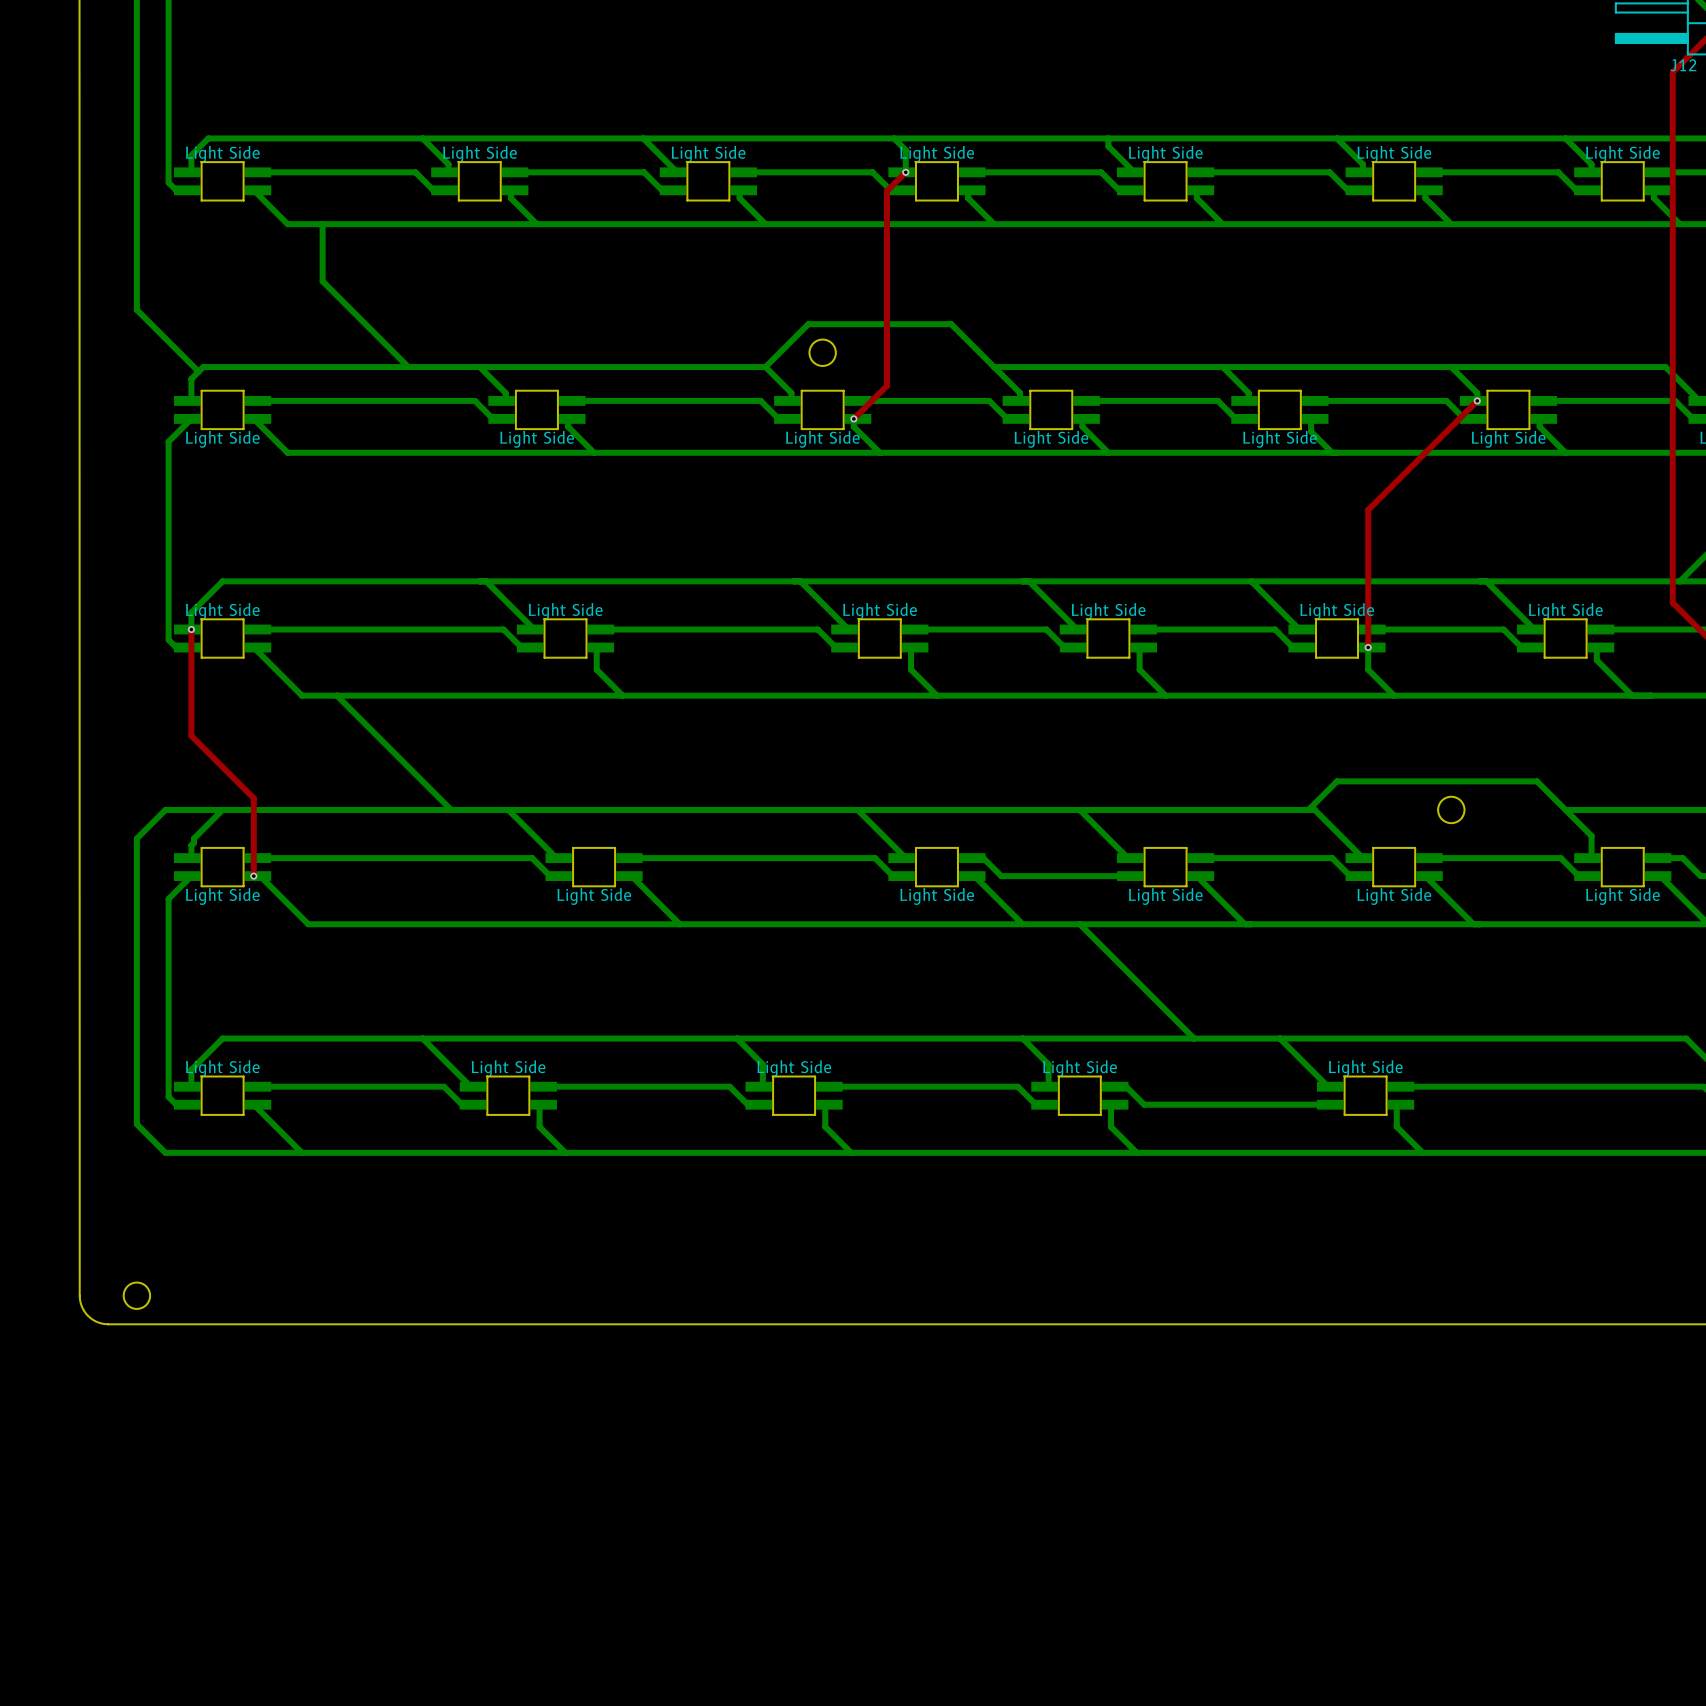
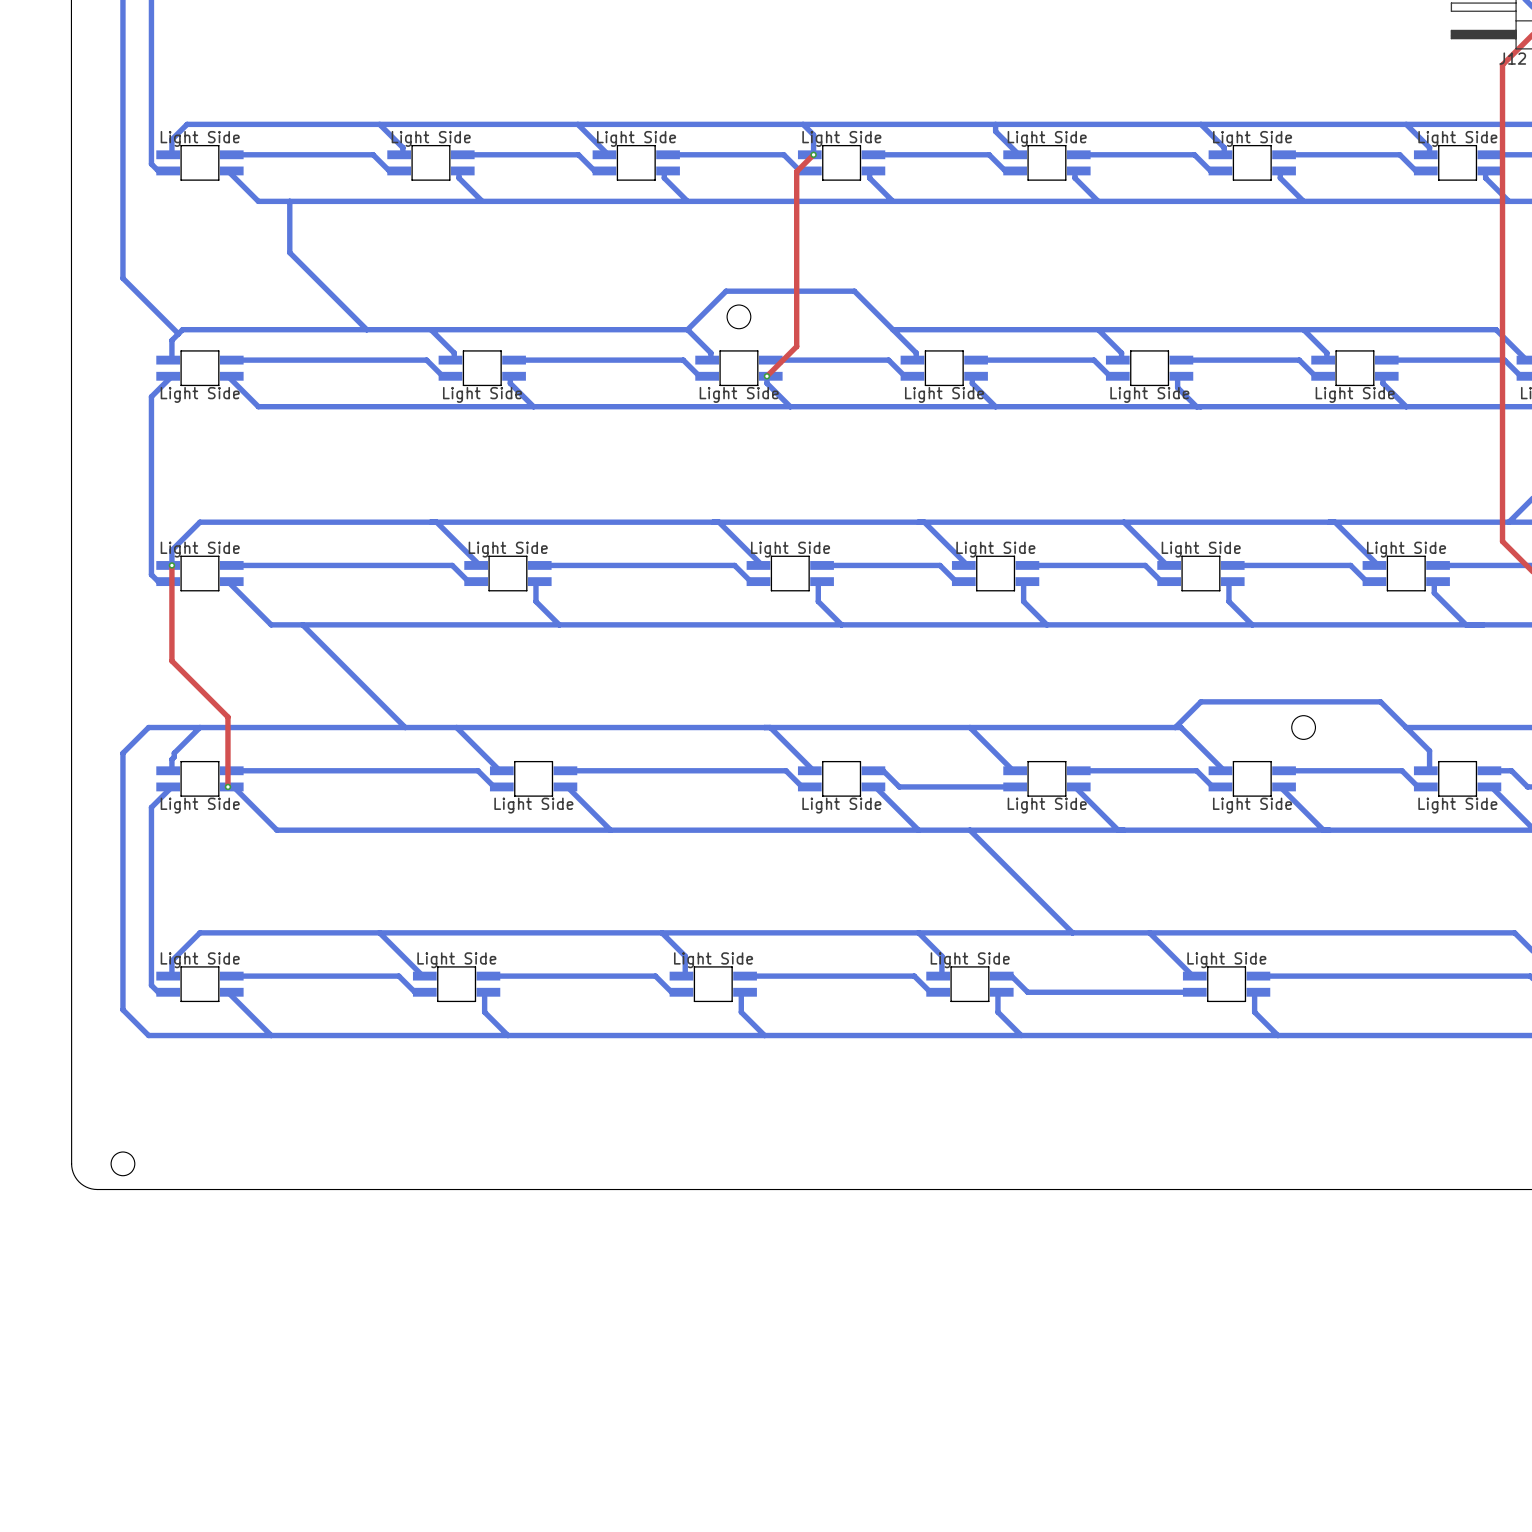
top track: (1477, 400) (1368, 509) (1368, 647) -> none
via: (1477, 400) -> none
via: (1368, 647) -> none

